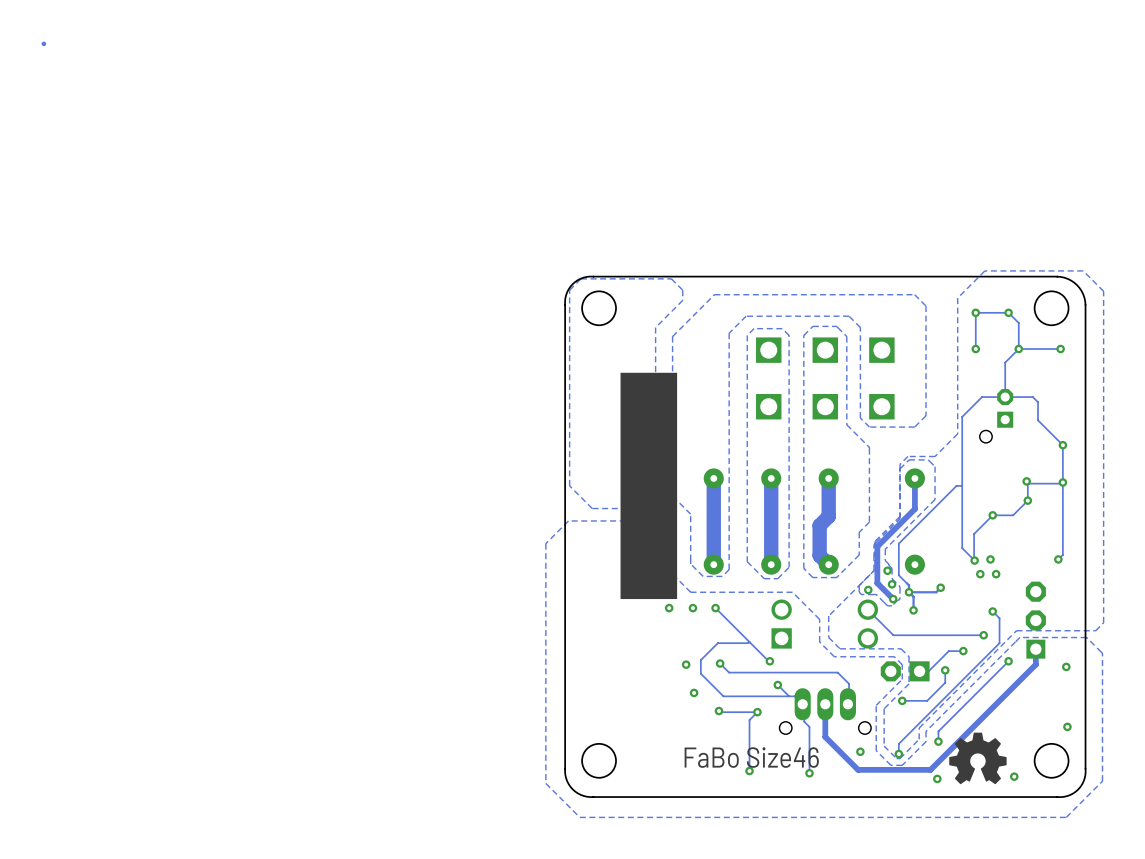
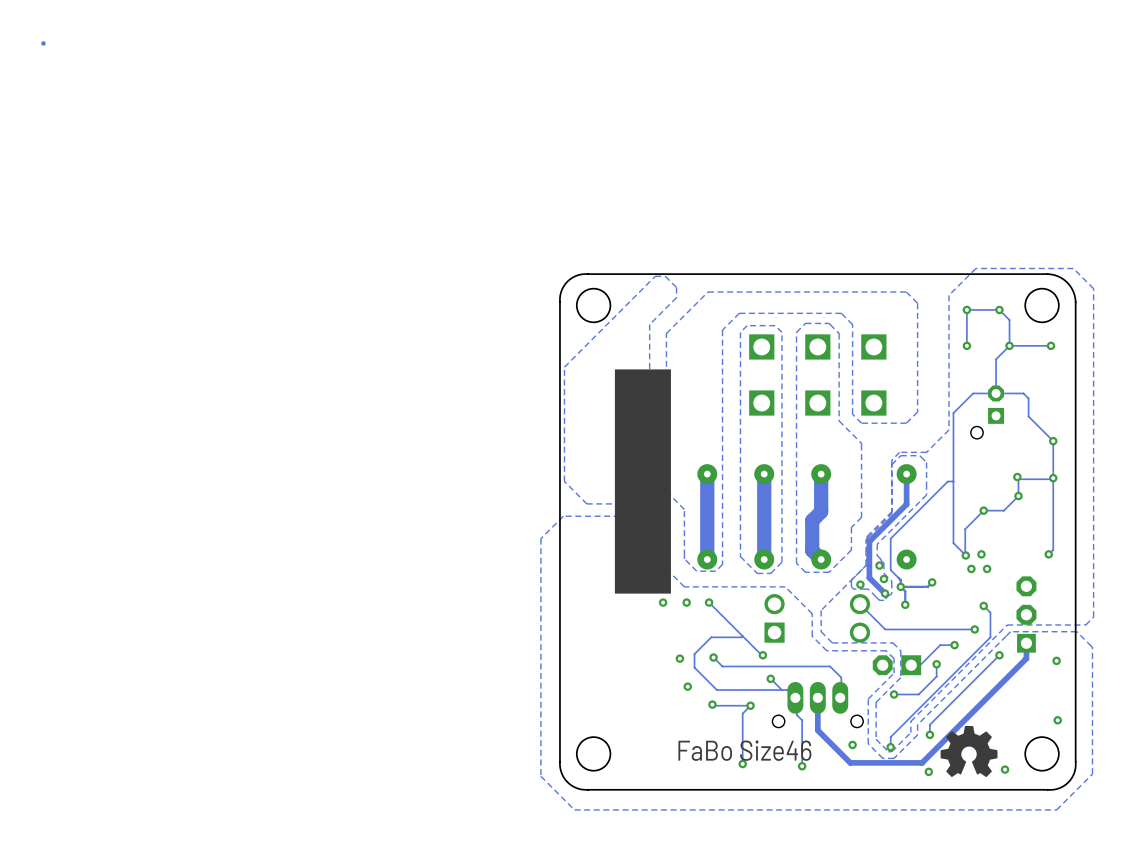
zone outline: (661, 278) (580, 278) (569, 290) (569, 370) -> (655, 276) (564, 367)

